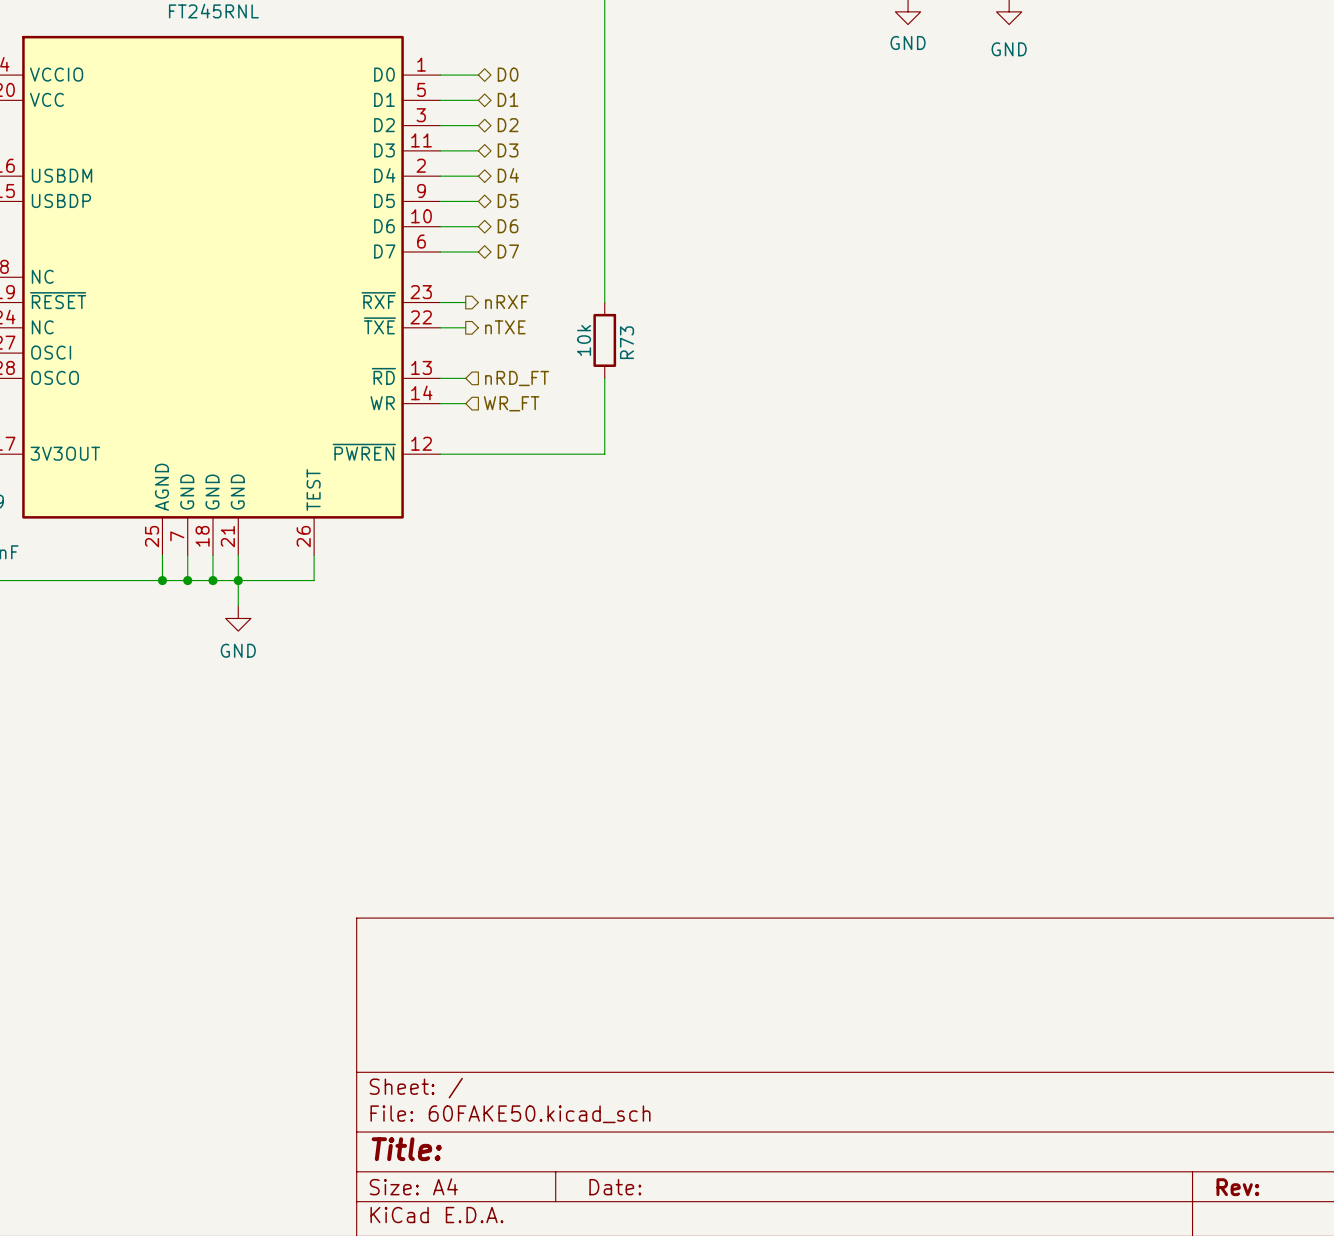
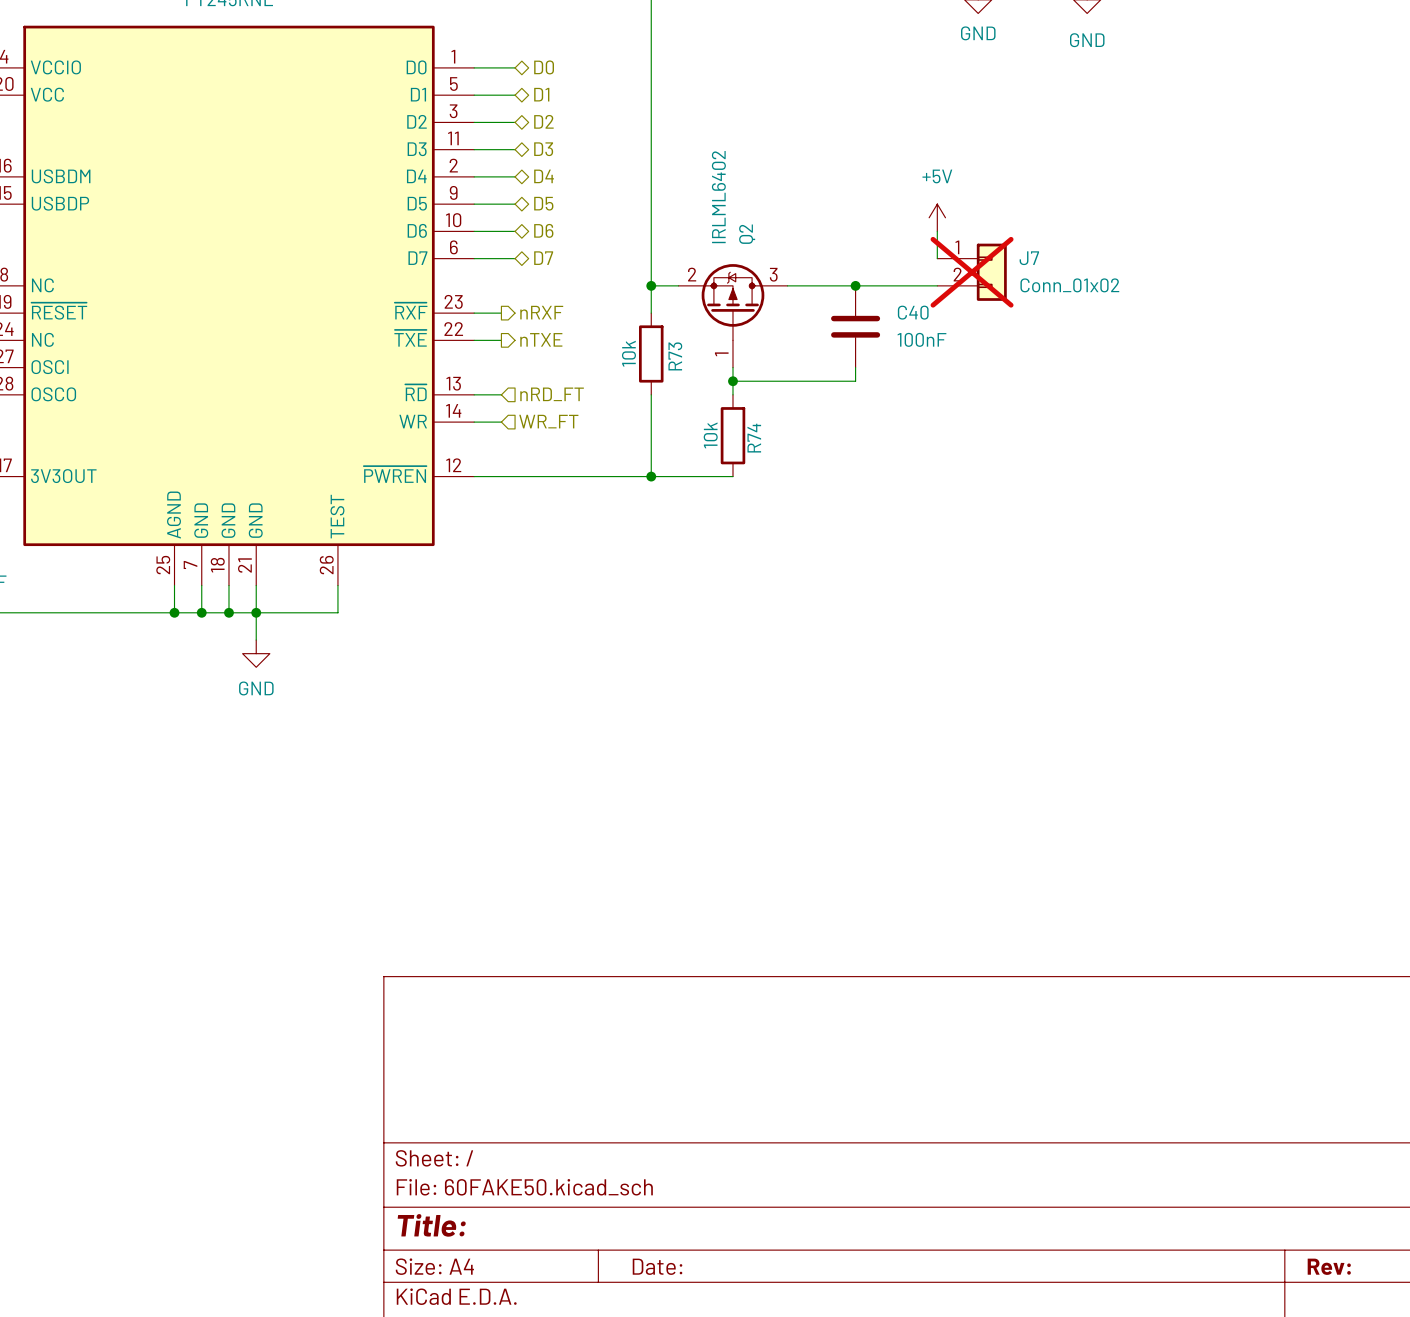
power symbol: none -> +5V (937, 217)
wire: none -> (937, 231) (937, 258)
J7: none -> Conn_01x02 (972, 272)
wire: none -> (651, 285) (678, 285)
junction: none -> (651, 285)
wire: none -> (787, 285) (937, 285)
junction: none -> (855, 285)
Q2: none -> IRLML6402 (732, 315)
C40: none -> 100nF (855, 326)
wire: none -> (732, 367) (732, 394)
wire: none -> (855, 367) (855, 381) (732, 381)
junction: none -> (732, 381)
R74: none -> 10k (732, 435)
wire: none -> (651, 476) (732, 476)
junction: none -> (651, 476)

